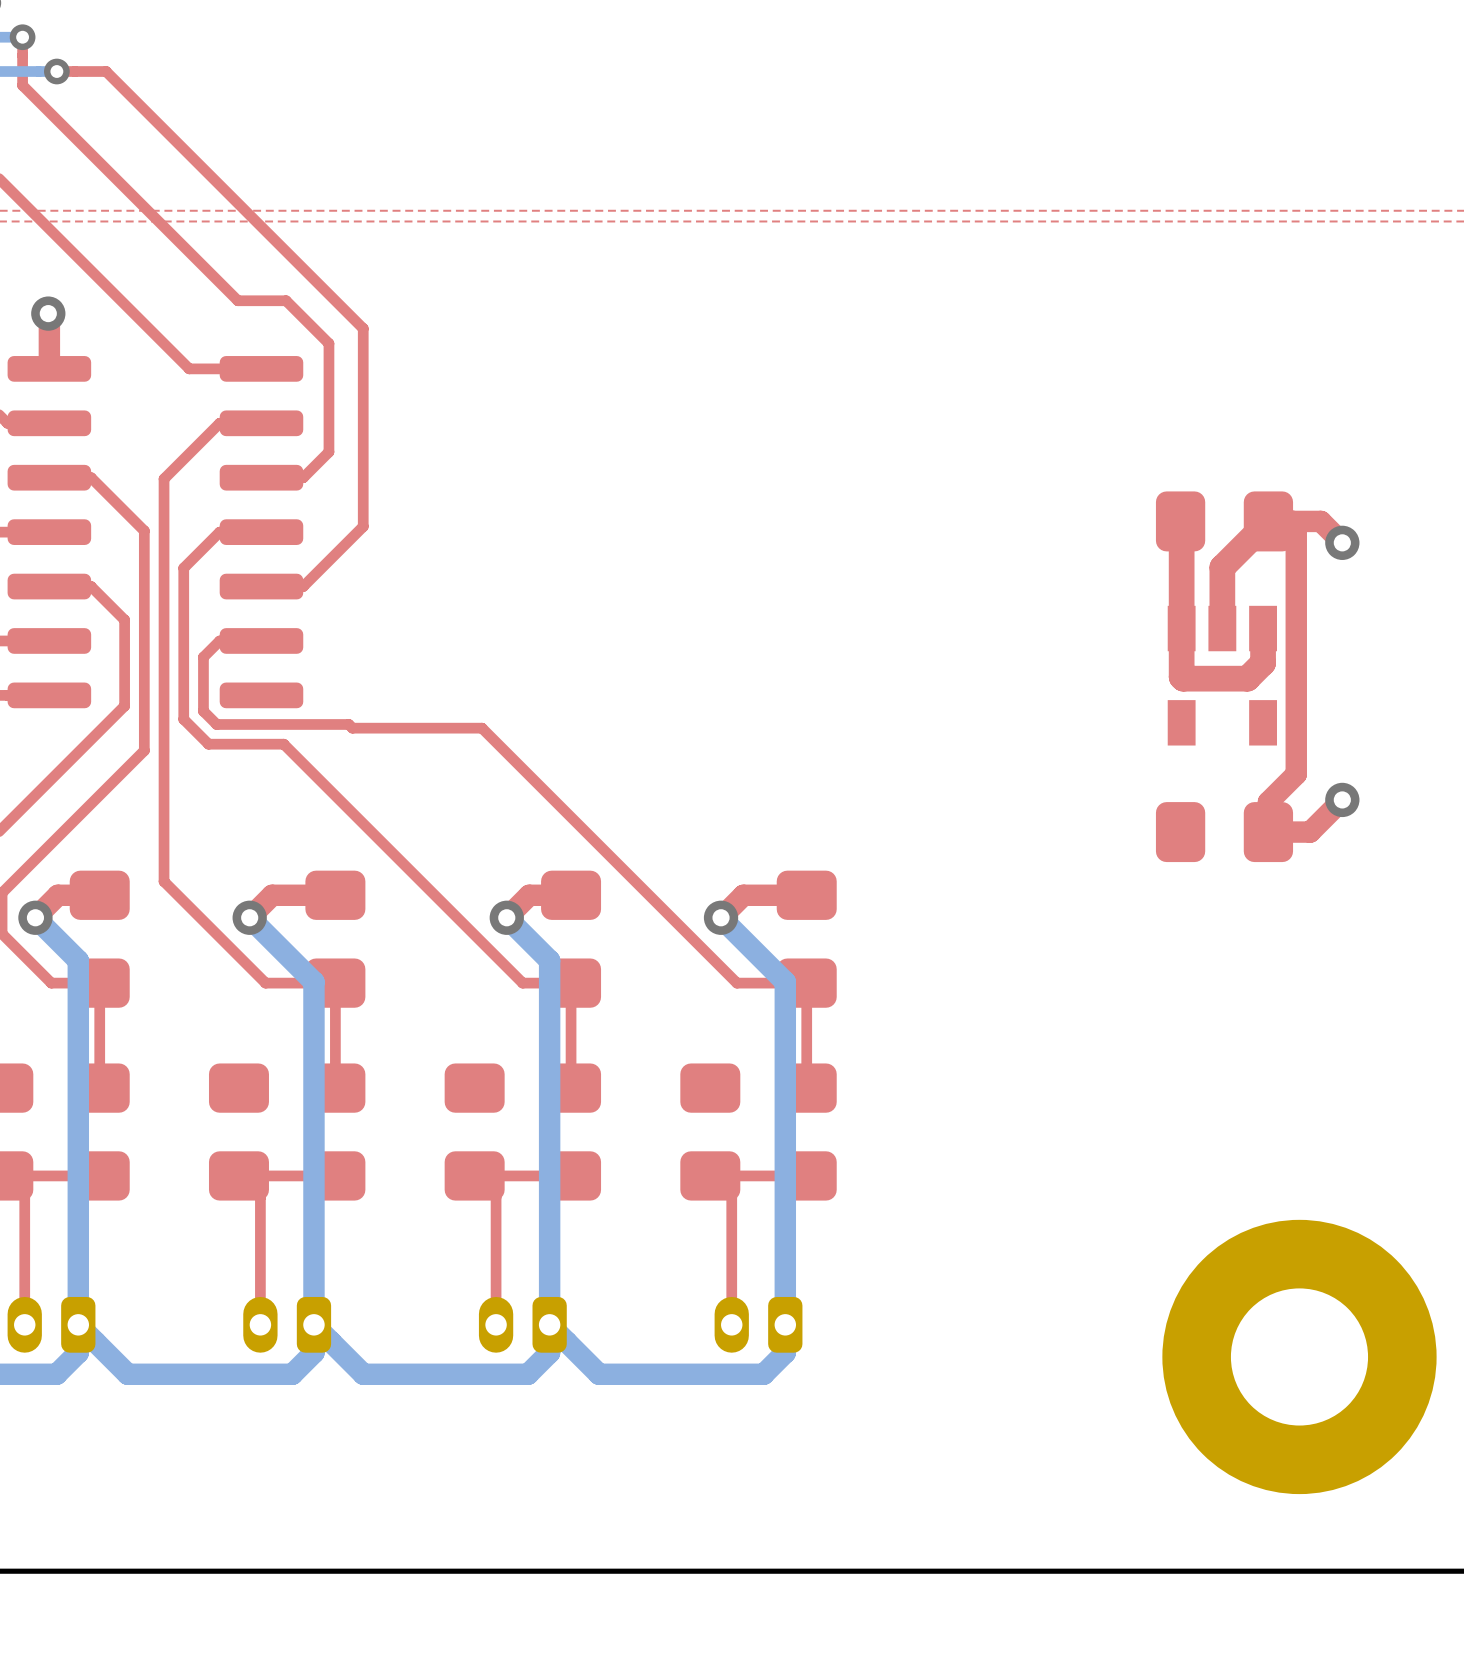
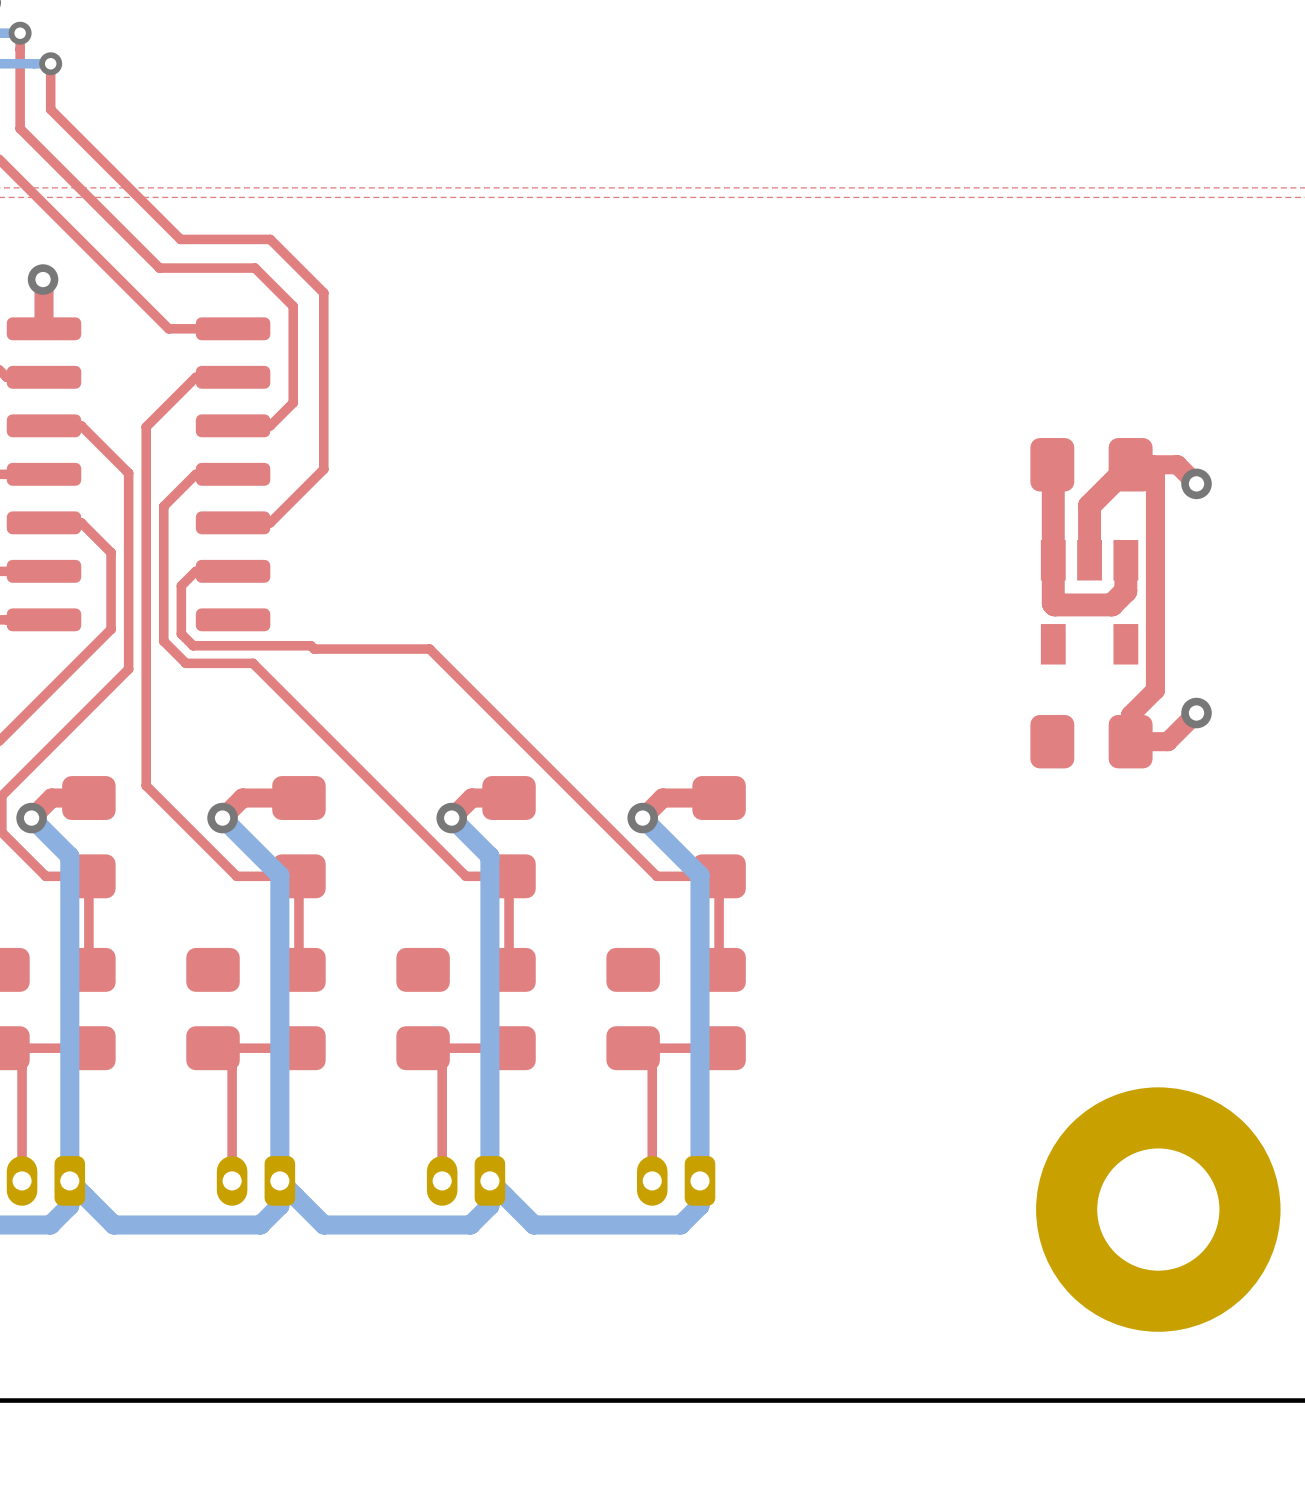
top track: (56, 71) (106, 71) (303, 268) -> (50, 63) (50, 109) (180, 239) (270, 239)
top track: (22, 85) (237, 300) -> (20, 76) (20, 128) (159, 268) (212, 268)

